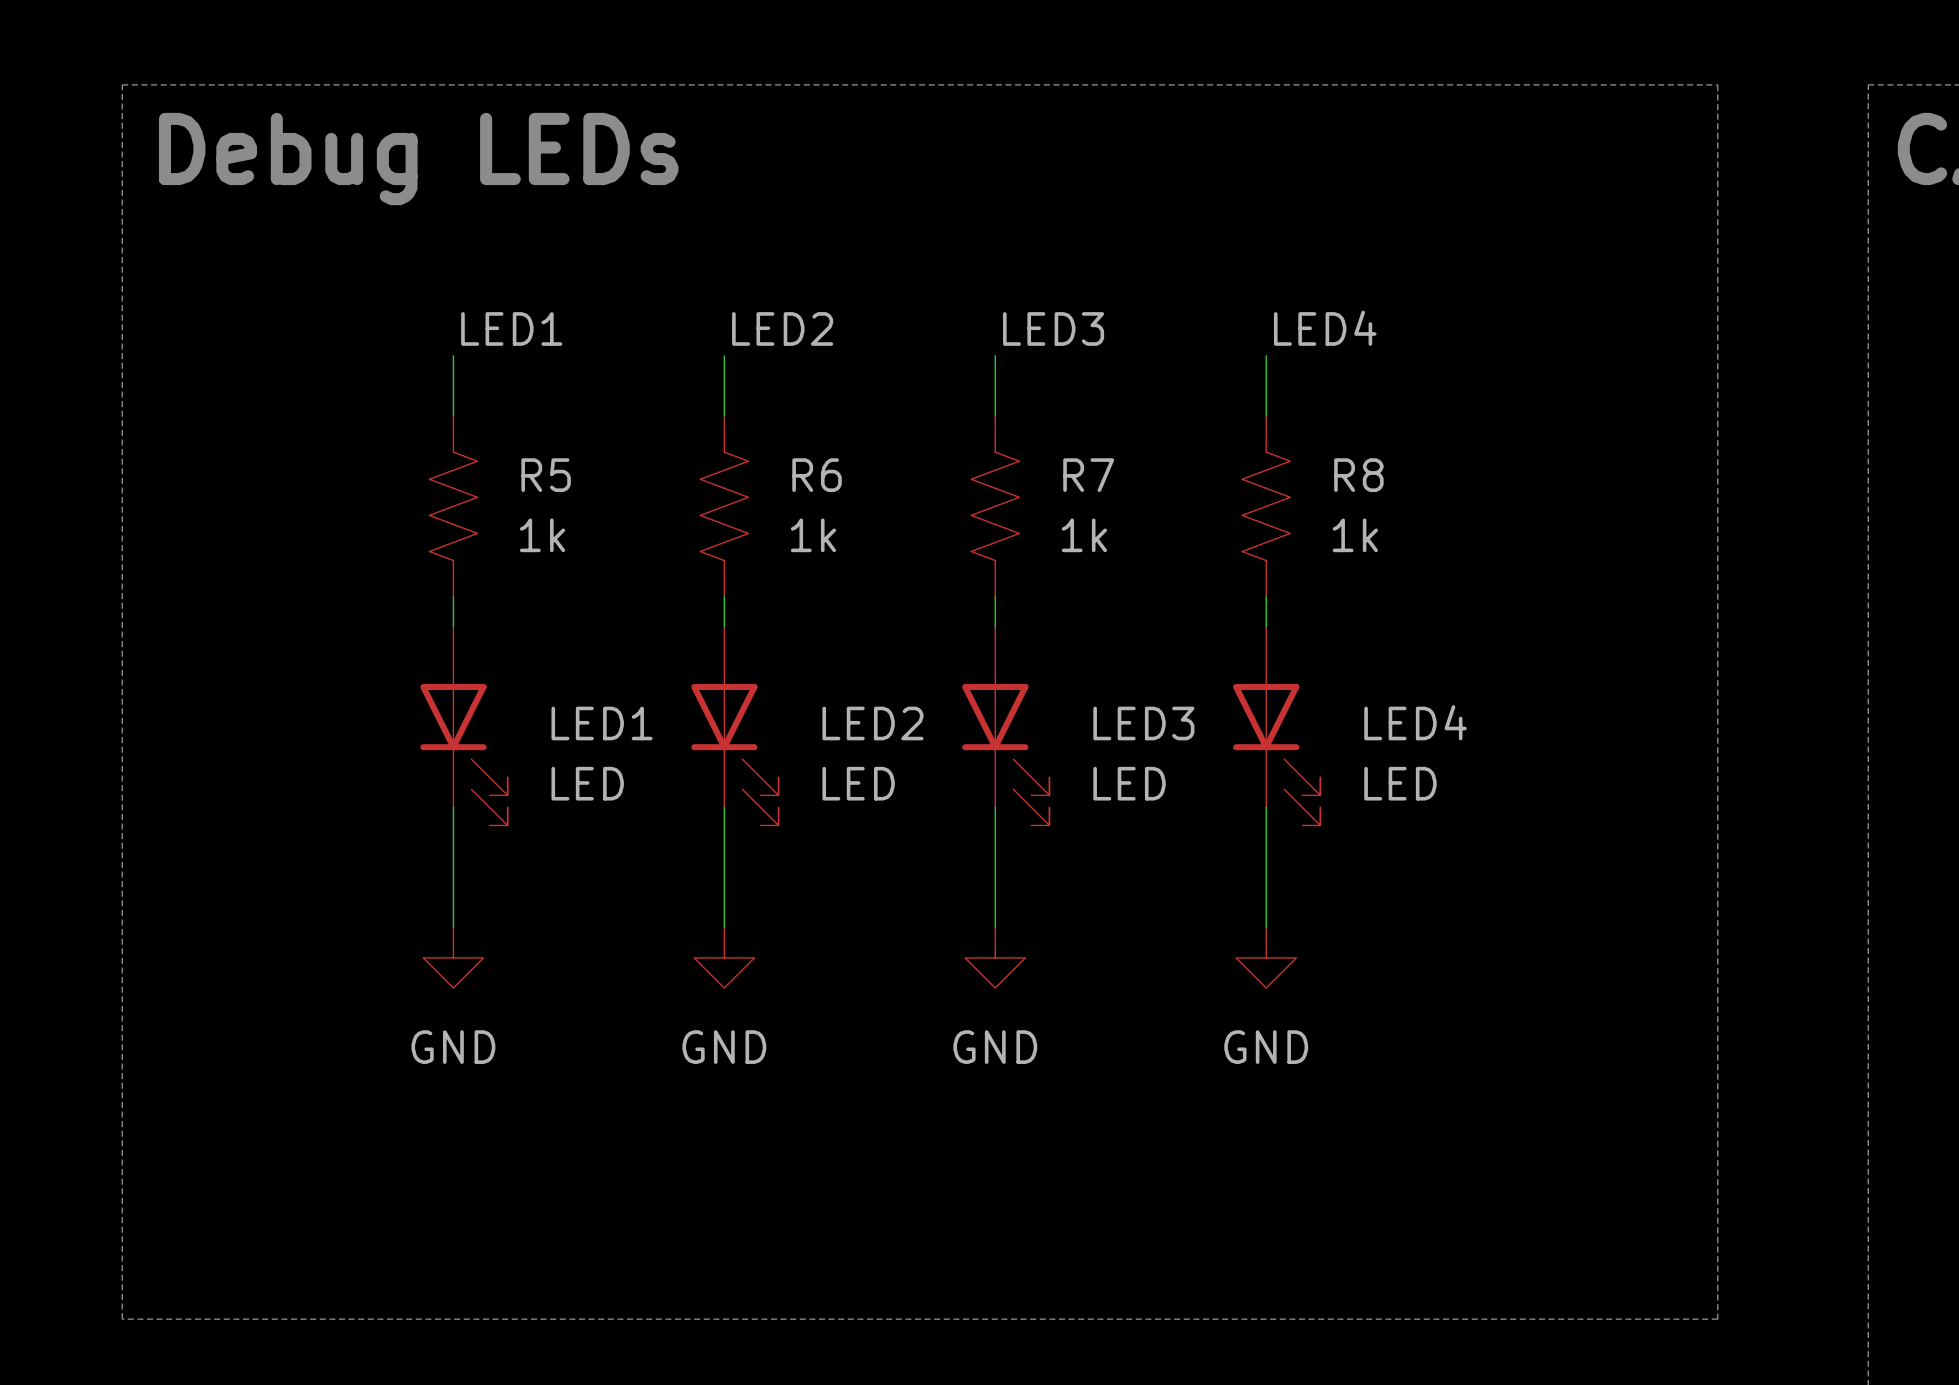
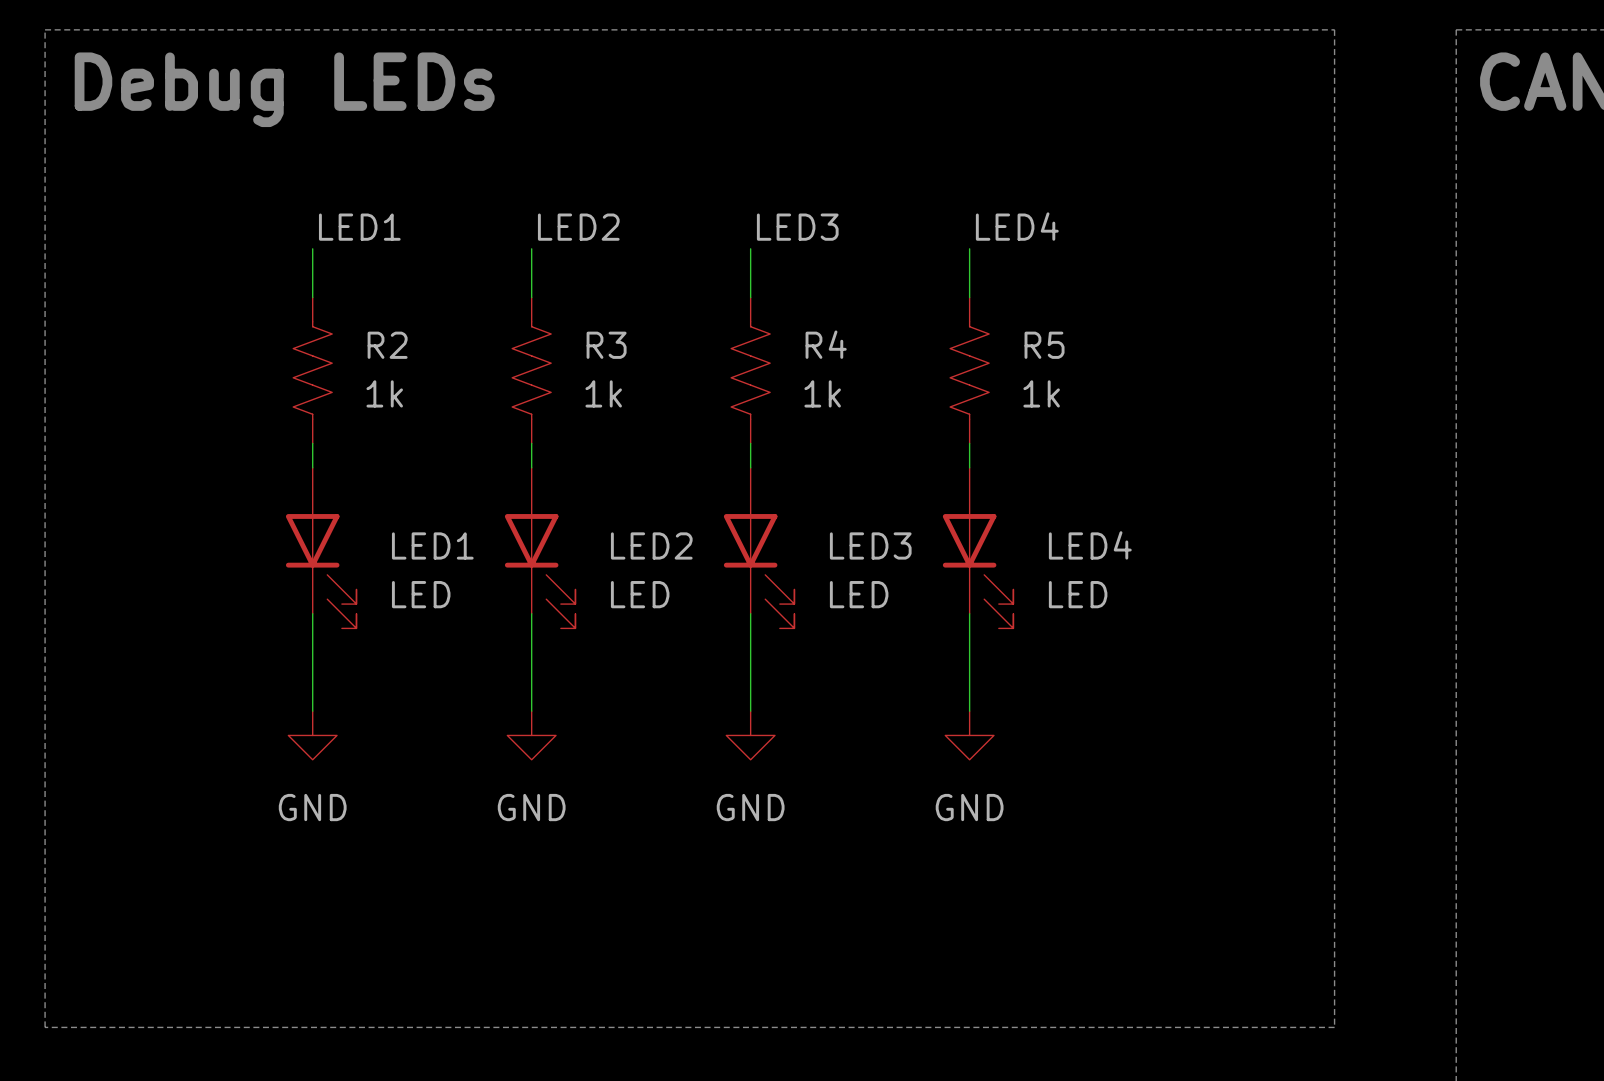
R5 name: R5 (546, 475) -> R2 (387, 345)
R6 name: R6 (817, 475) -> R3 (606, 345)
R7 name: R7 (1088, 475) -> R4 (826, 344)
R8 name: R8 (1358, 475) -> R5 (1044, 345)

